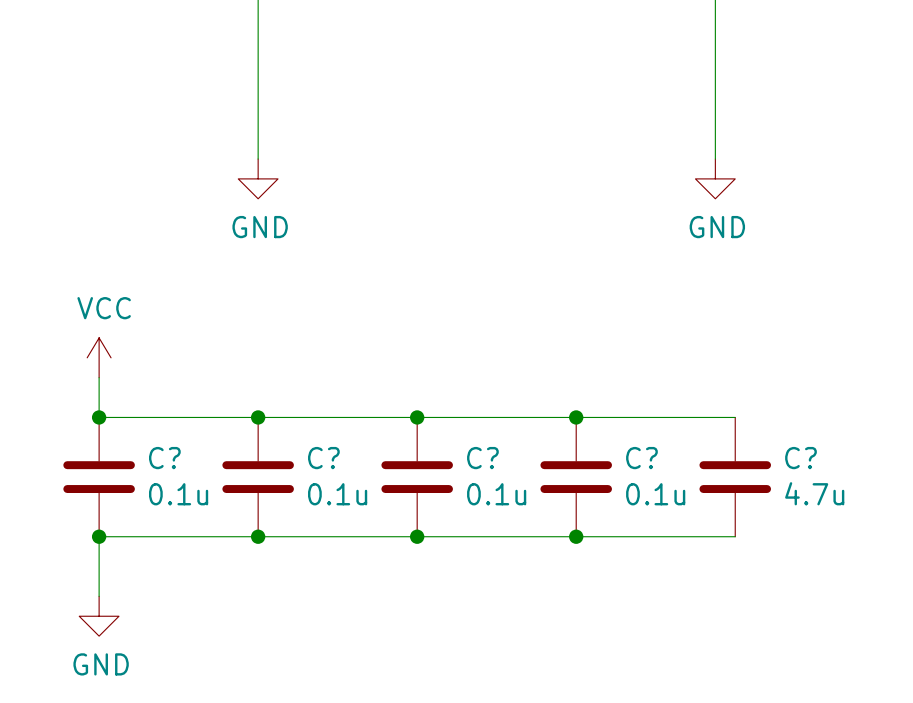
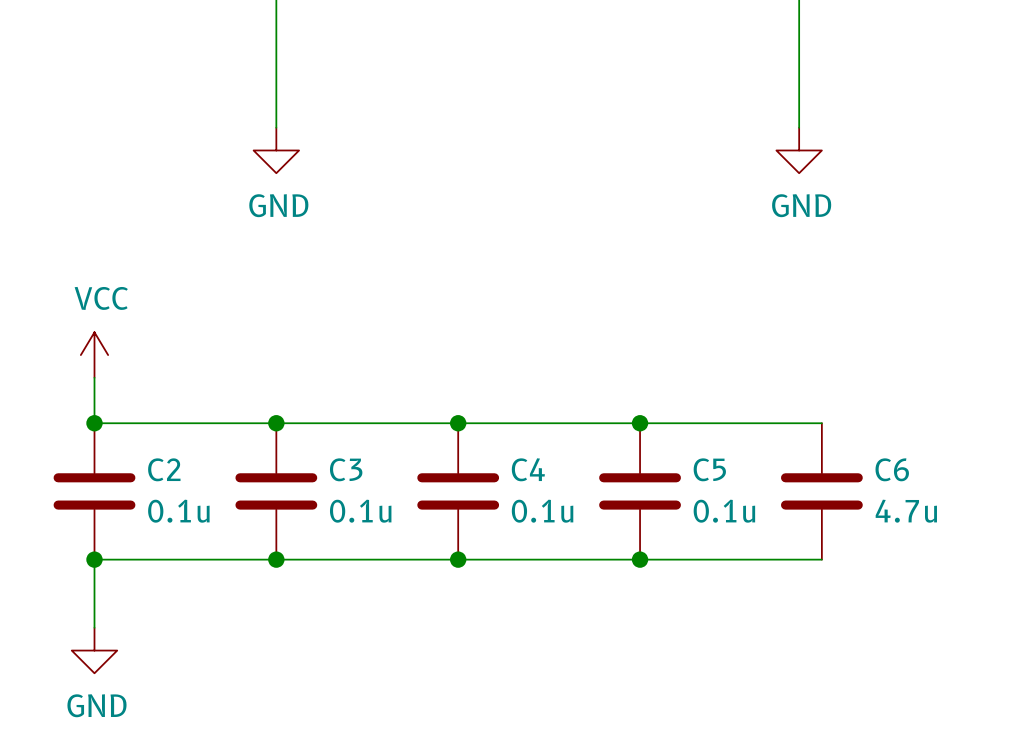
C? name: C? (164, 458) -> C2 (164, 469)
C? name: C? (323, 458) -> C3 (346, 469)
C? name: C? (482, 458) -> C4 (528, 469)
C? name: C? (641, 458) -> C5 (709, 469)
C? name: C? (800, 458) -> C6 (892, 469)

